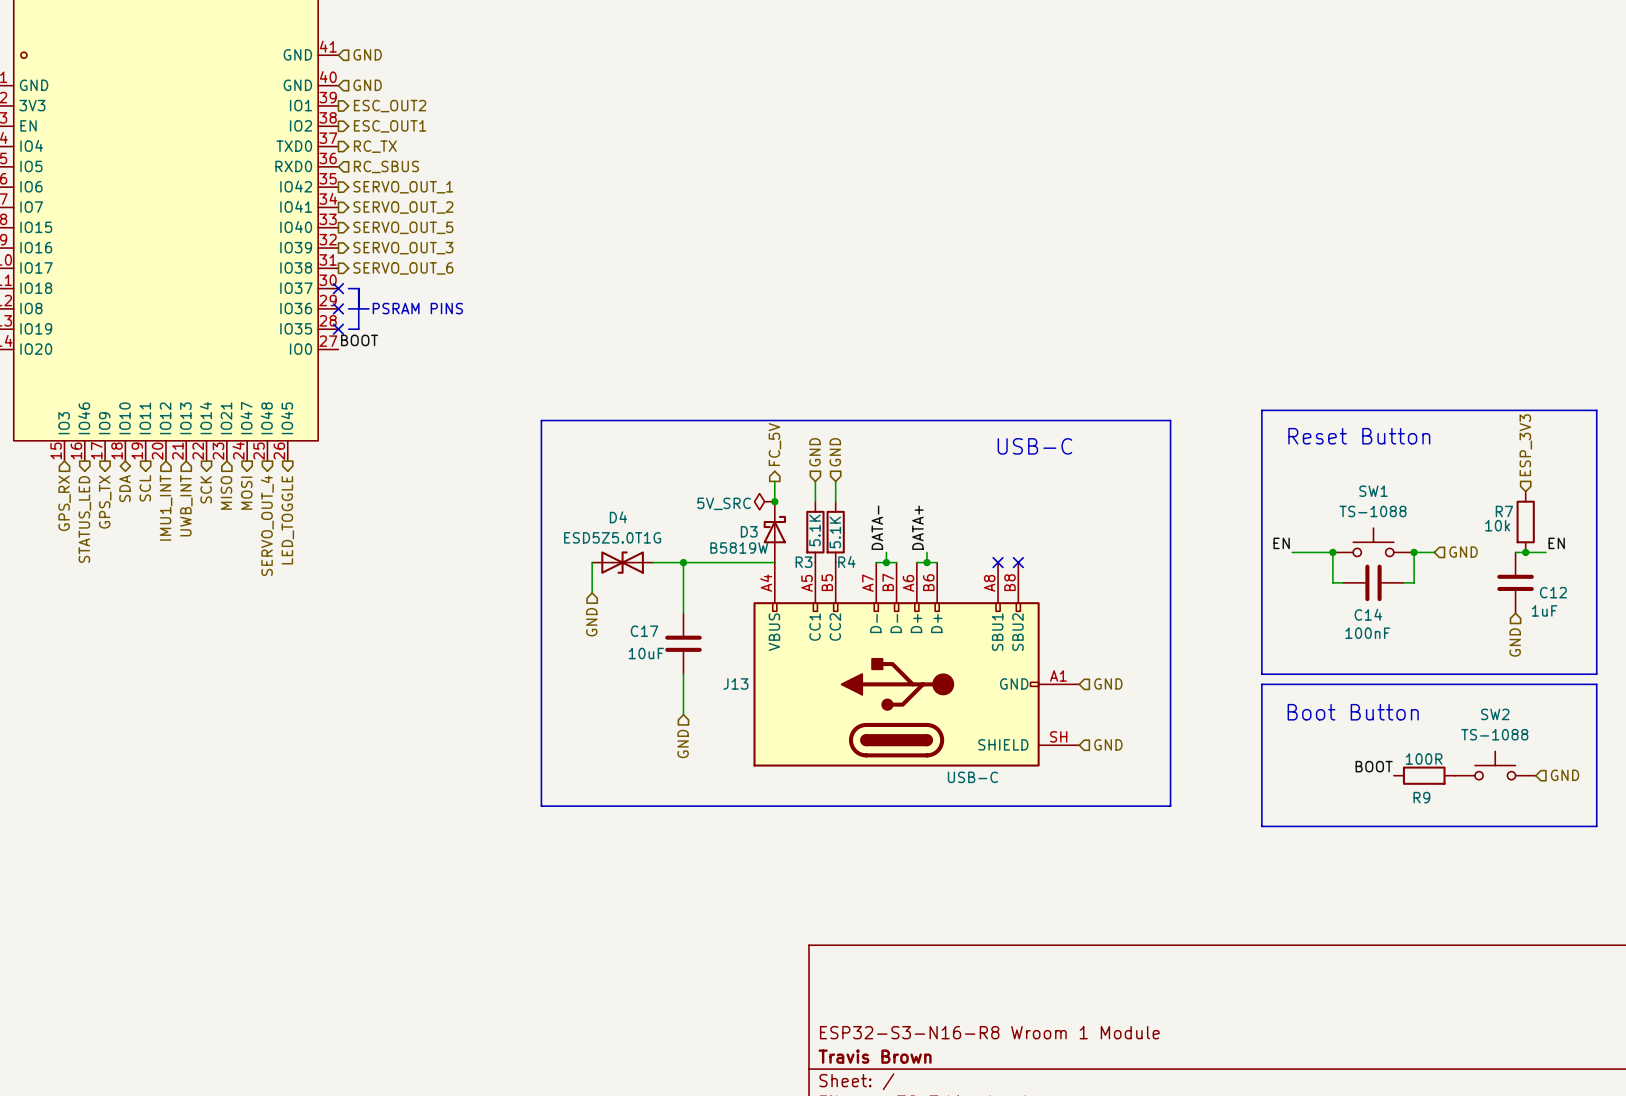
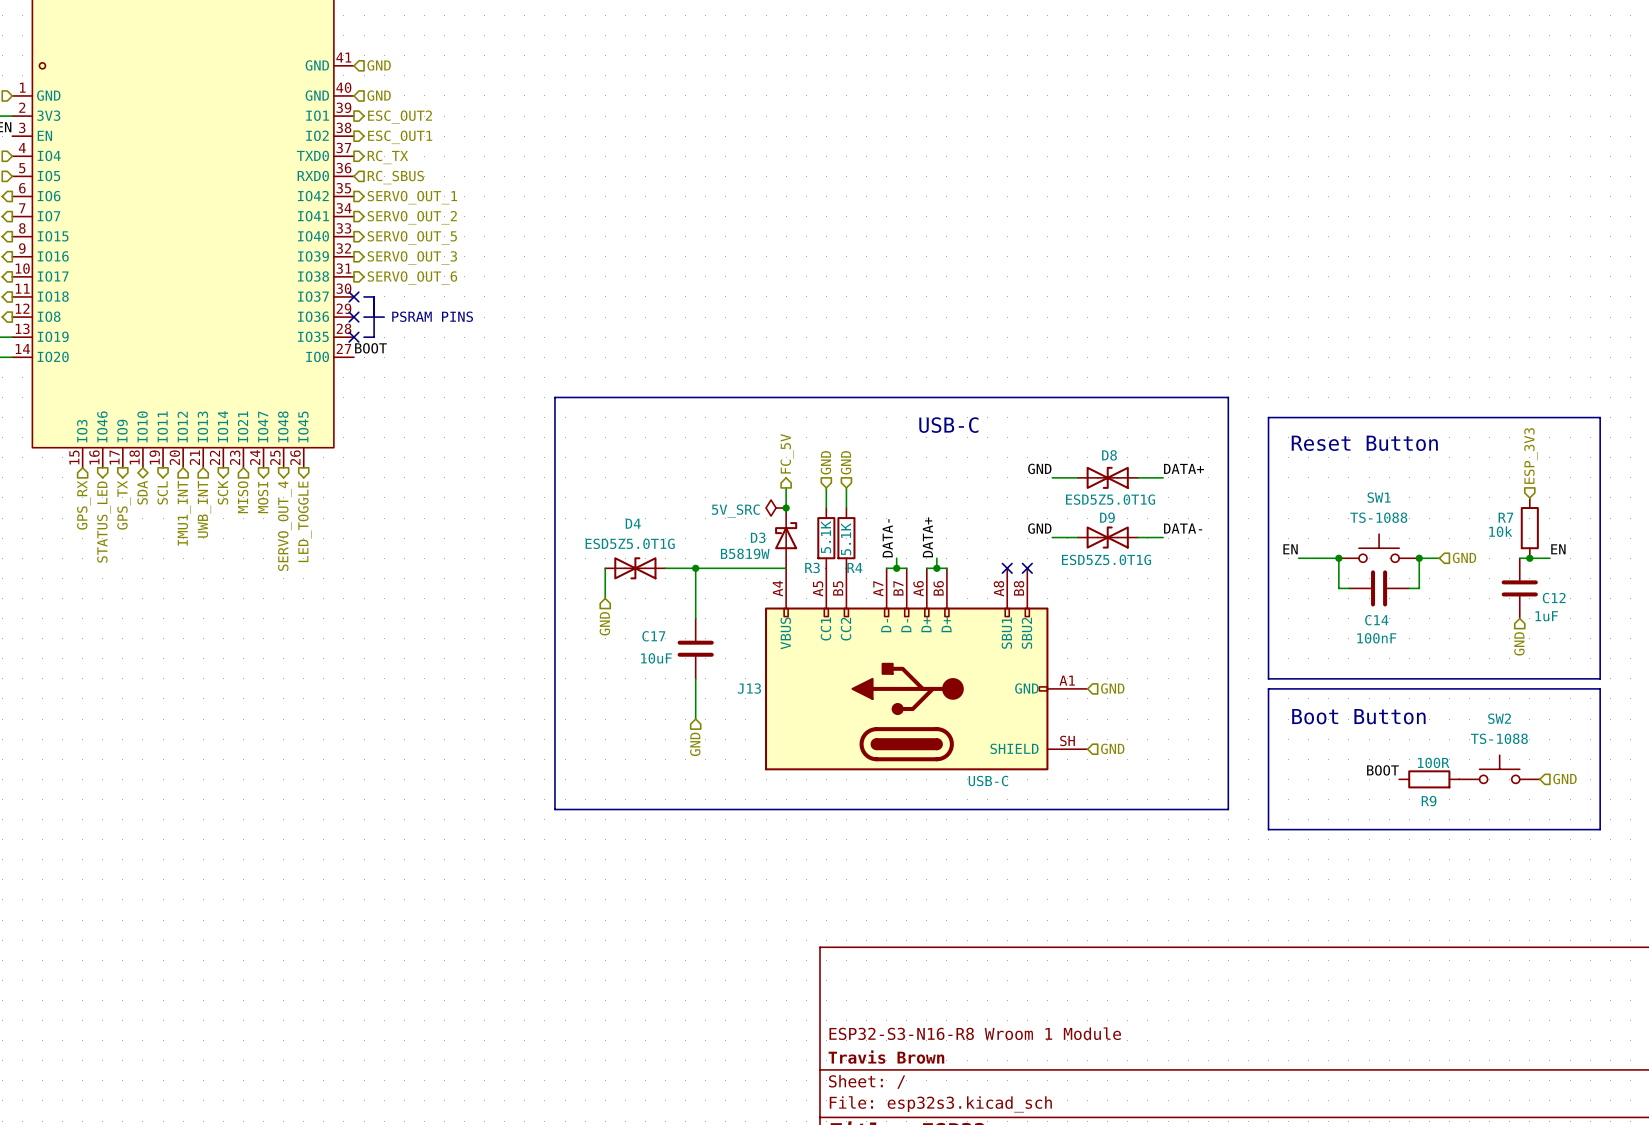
line: (541, 420) (1170, 420) (1170, 806) -> (554, 427) (554, 397) (1228, 397) (1228, 809) (1178, 809)
text position: USB-C (1034, 446) -> USB-C (948, 425)
label: none -> GND (1039, 468)
label: none -> DATA+ (1184, 468)
wire: none -> (1052, 477) (1077, 477)
D8: none -> ESD5Z5.0T1G (1107, 477)
wire: none -> (1137, 477) (1163, 477)
label: none -> GND (1039, 528)
label: none -> DATA- (1183, 528)
wire: none -> (1052, 537) (1077, 537)
D9: none -> ESD5Z5.0T1G (1107, 537)
wire: none -> (1137, 537) (1163, 537)

